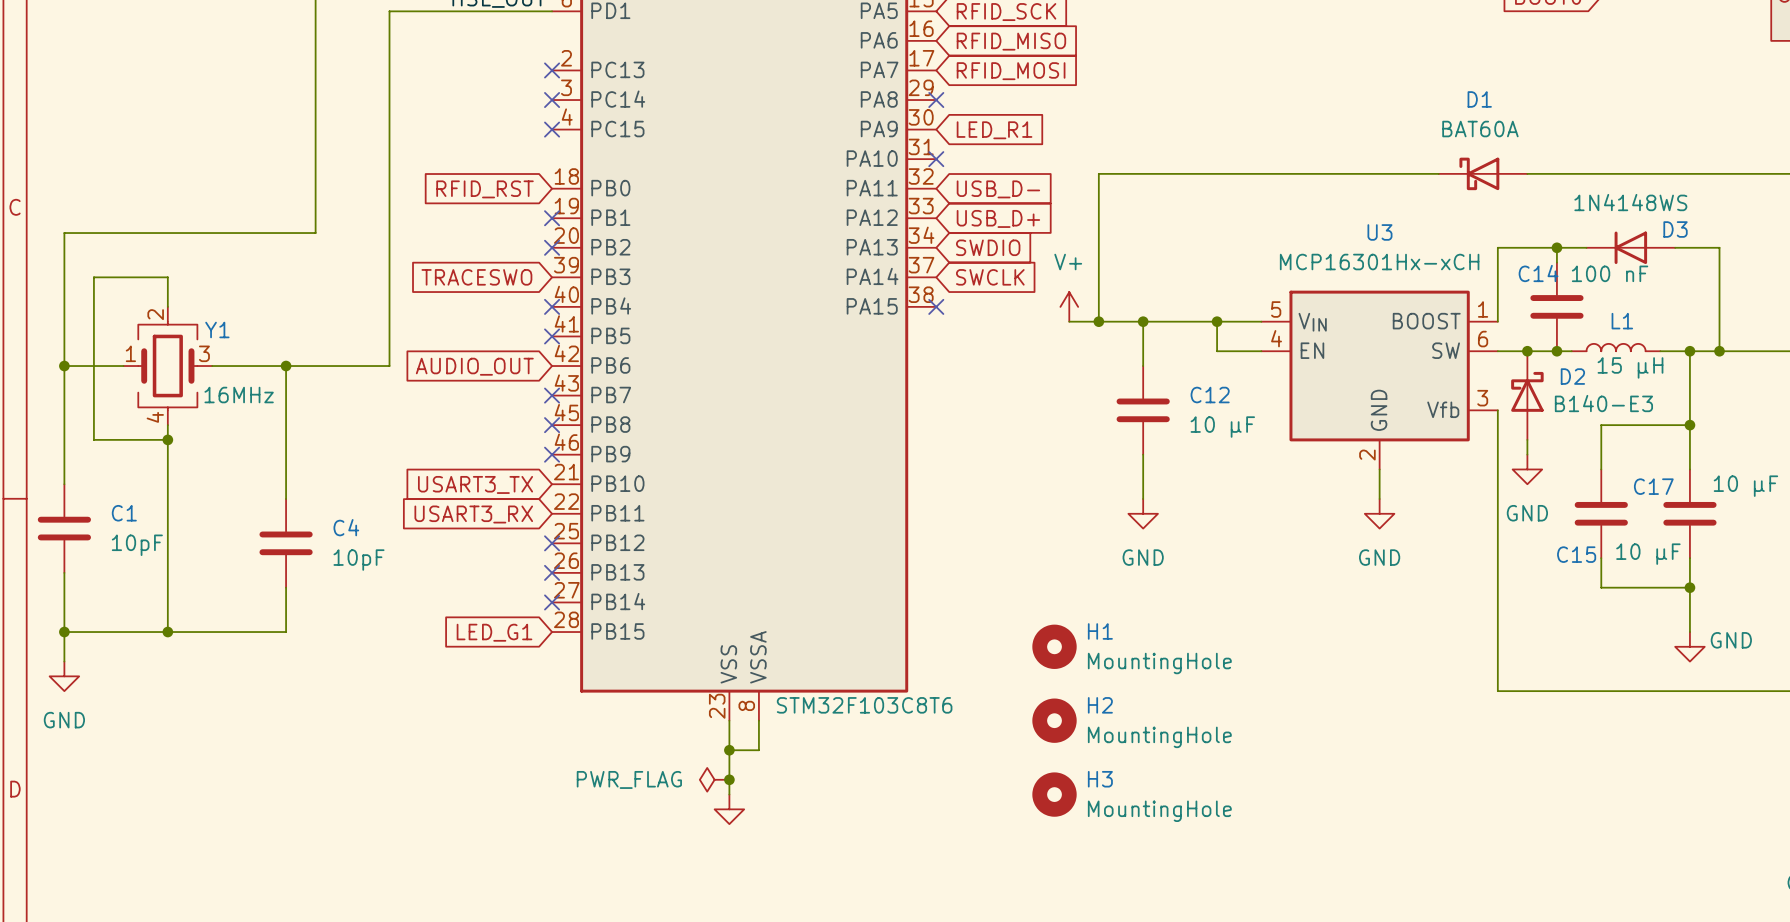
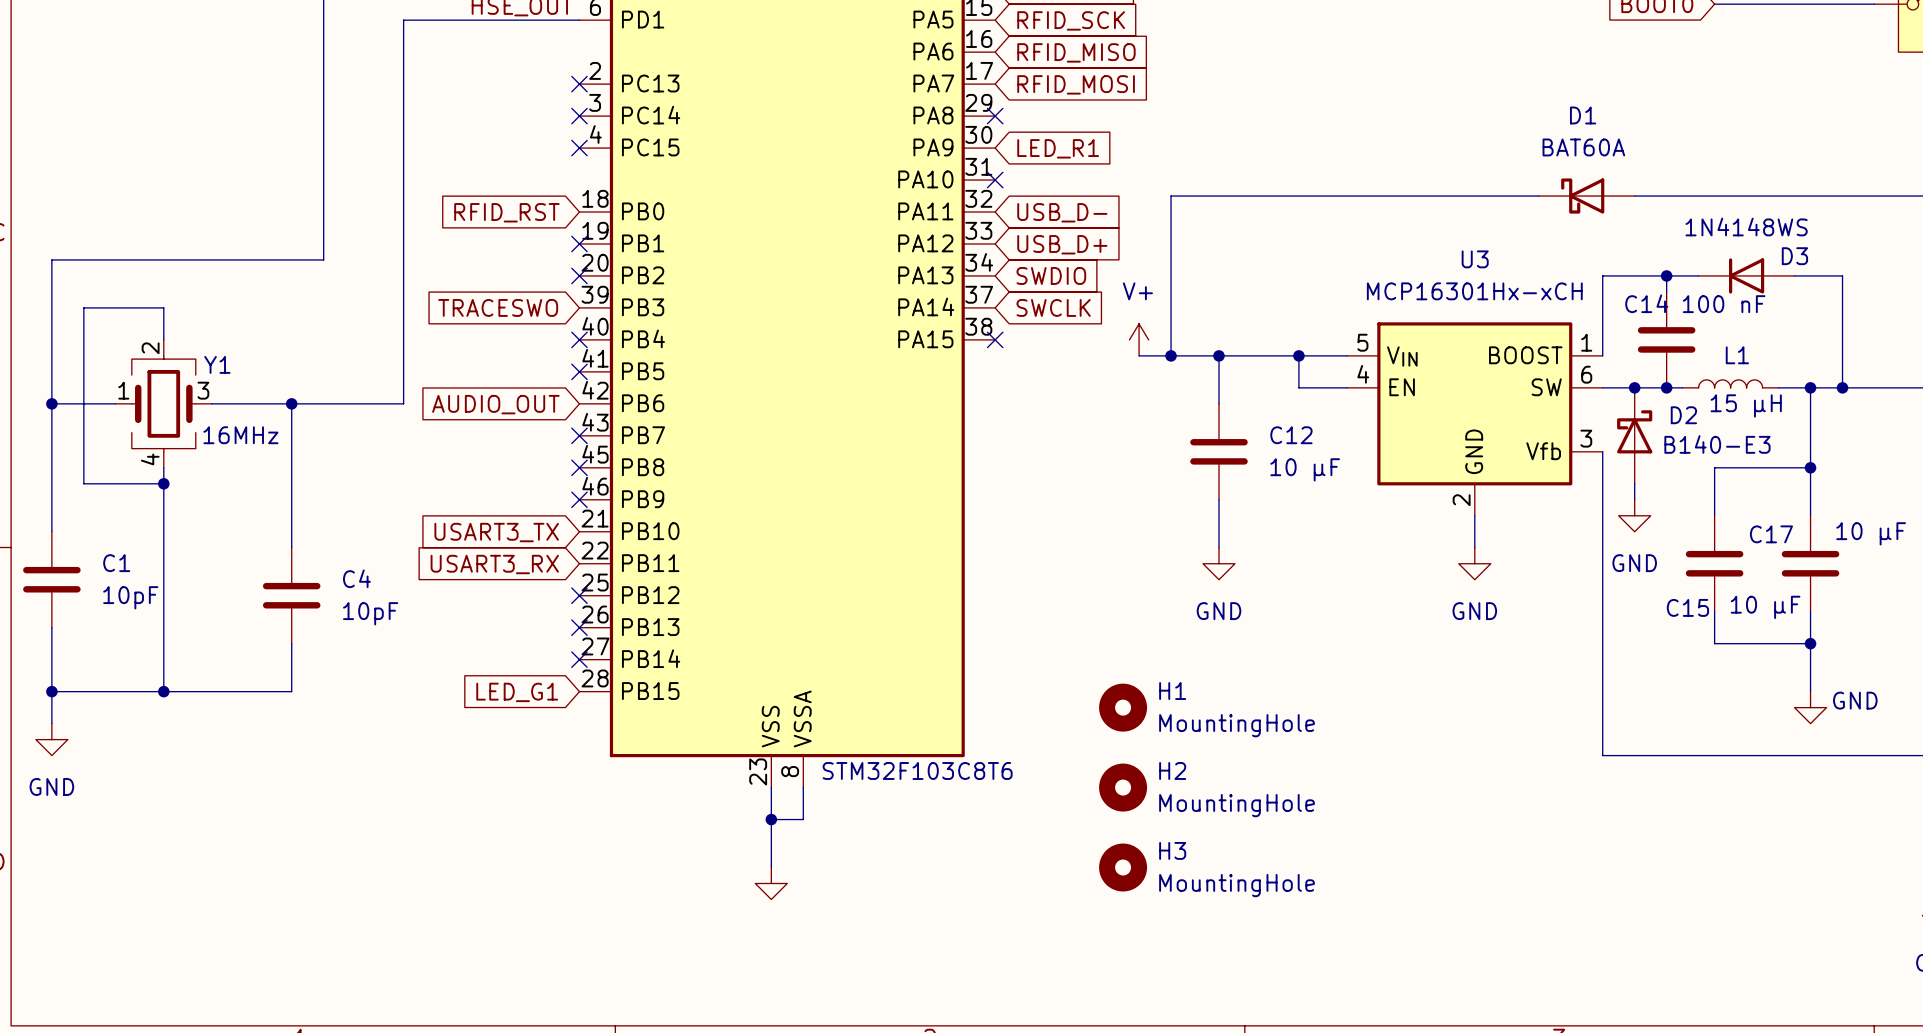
power symbol: PWR_FLAG (714, 779) -> none
junction: (729, 779) -> none

